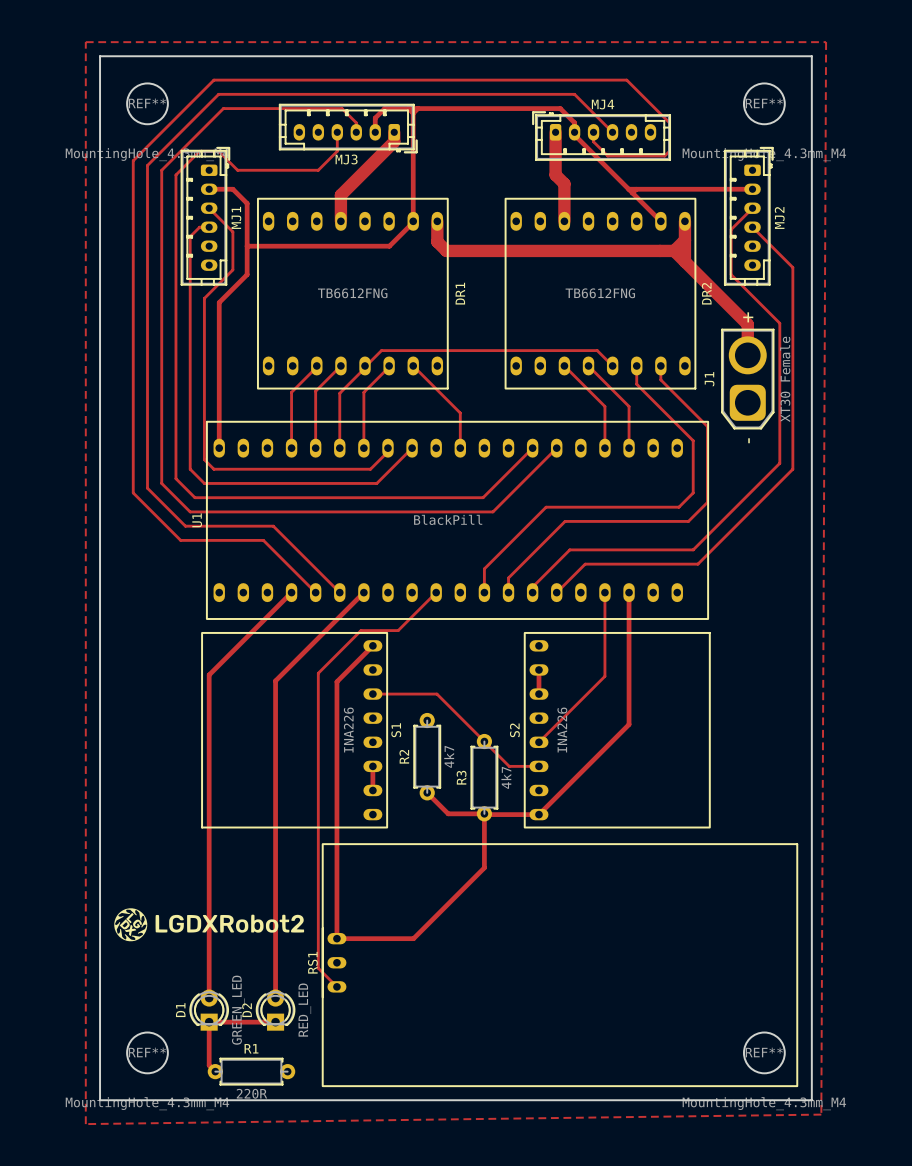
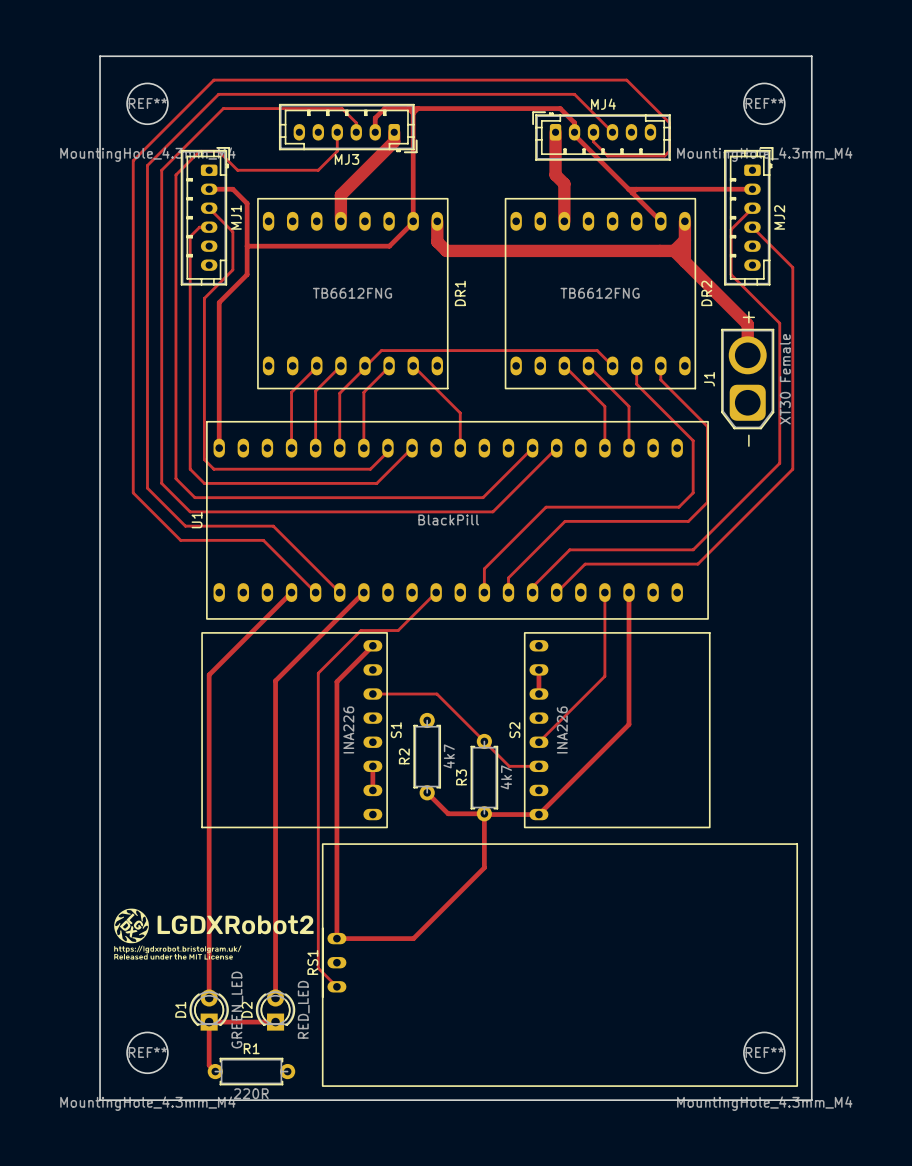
zone outline: (85, 42) (826, 42) (821, 1114) (85, 1124) (85, 42) -> none
drawing: [114, 908, 305, 942] -> none
drawing: none -> [114, 908, 314, 960]

